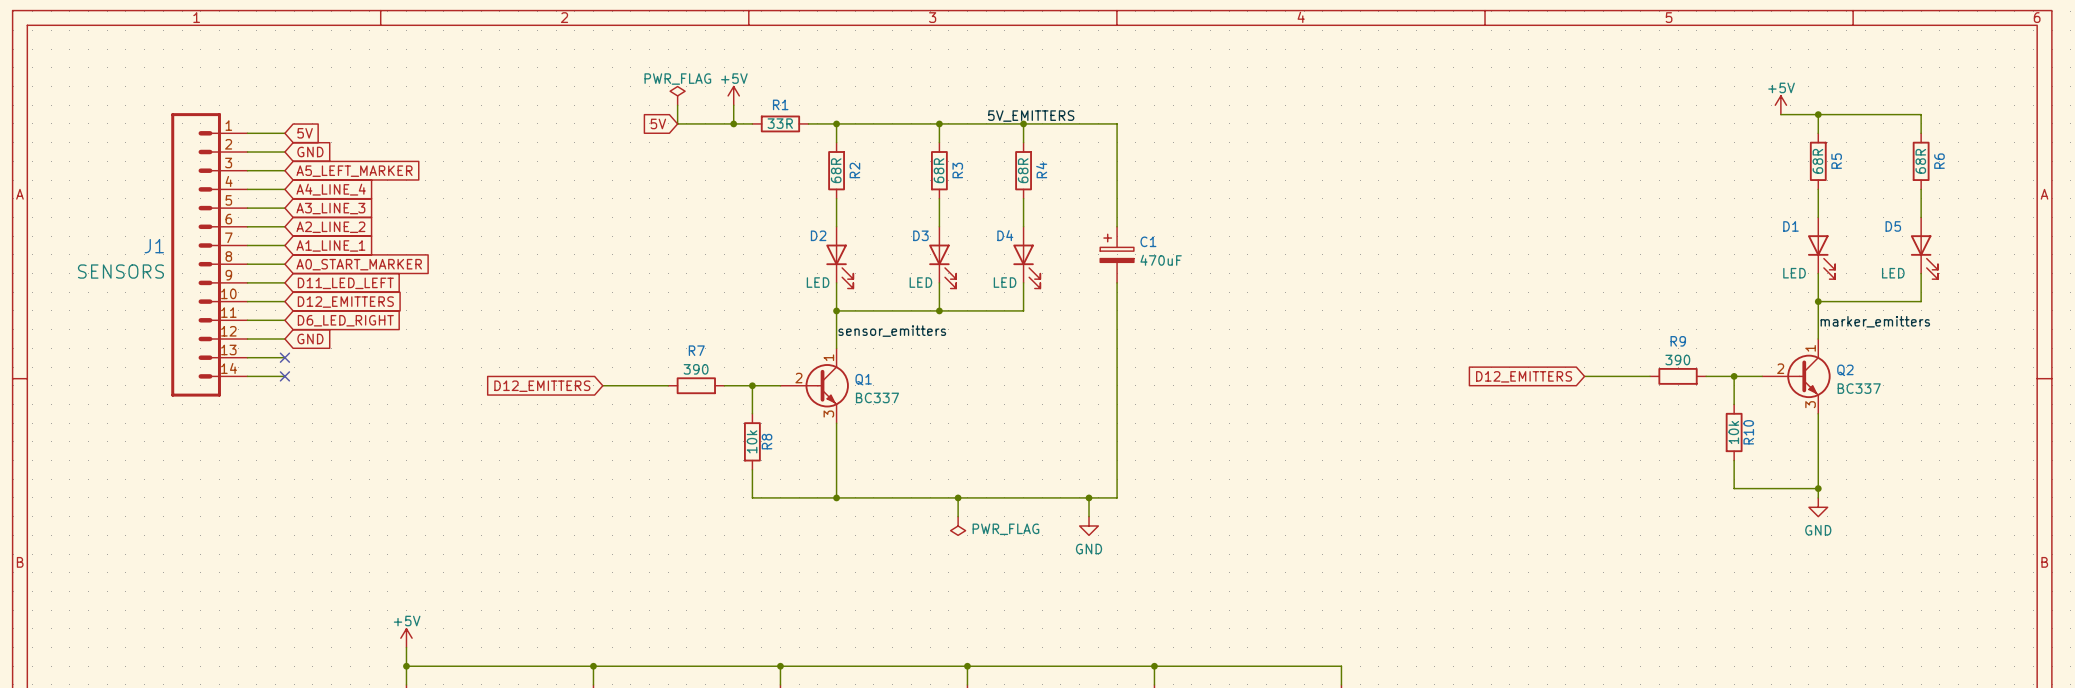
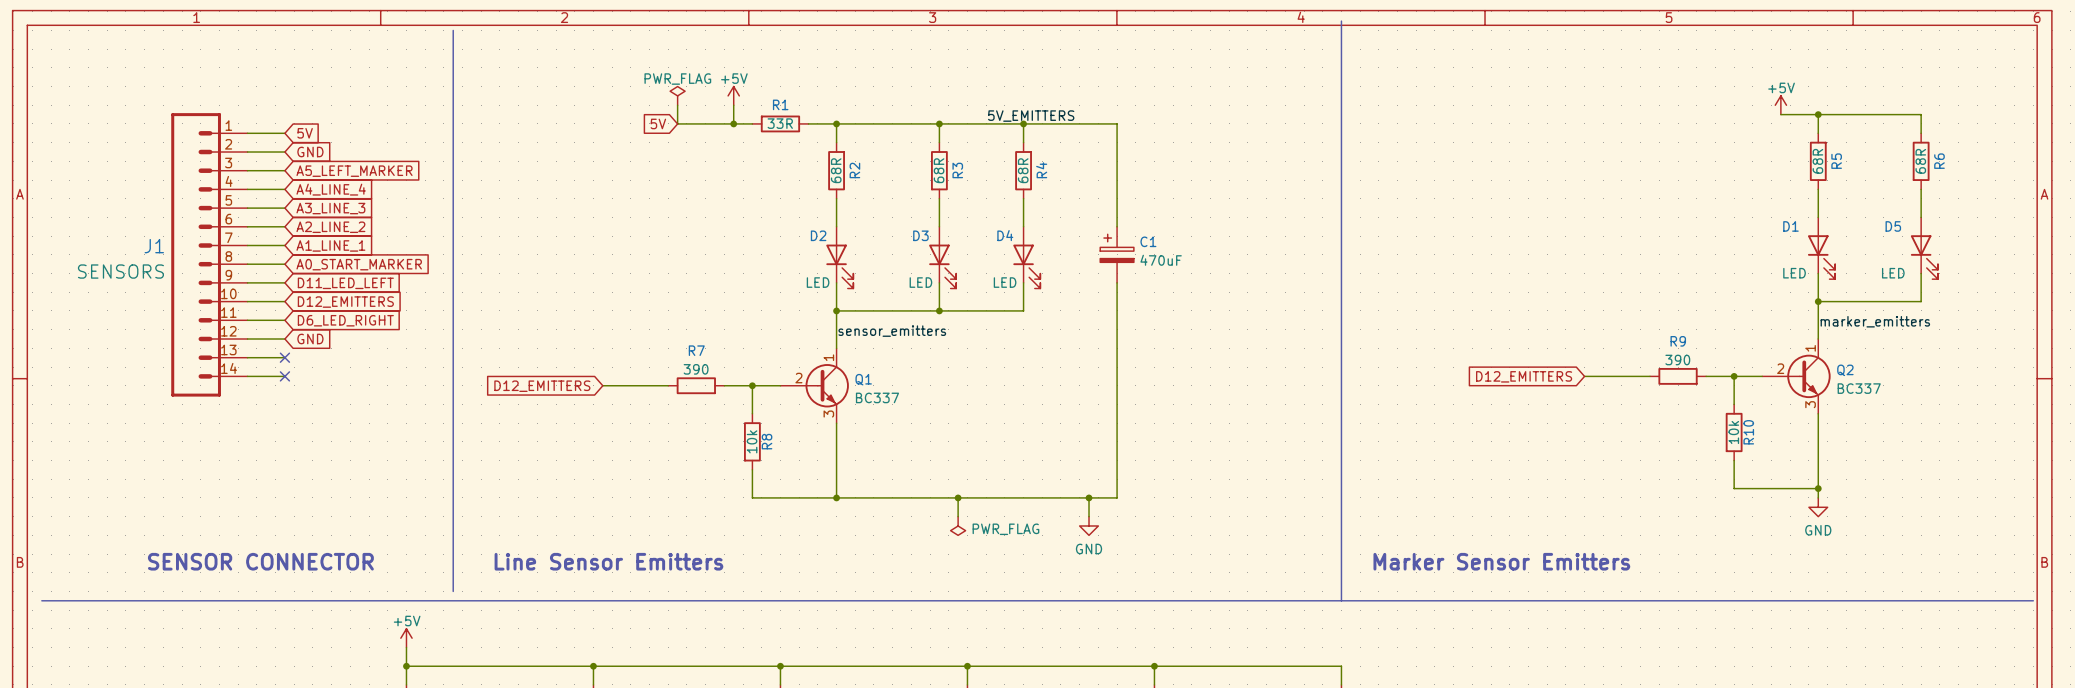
line: none -> (1341, 21) (1341, 600)
line: none -> (453, 30) (453, 591)
text: none -> SENSOR CONNECTOR (260, 561)
text: none -> Line Sensor Emitters (608, 561)
text: none -> Marker Sensor Emitters (1501, 561)
line: none -> (41, 600) (2033, 600)

